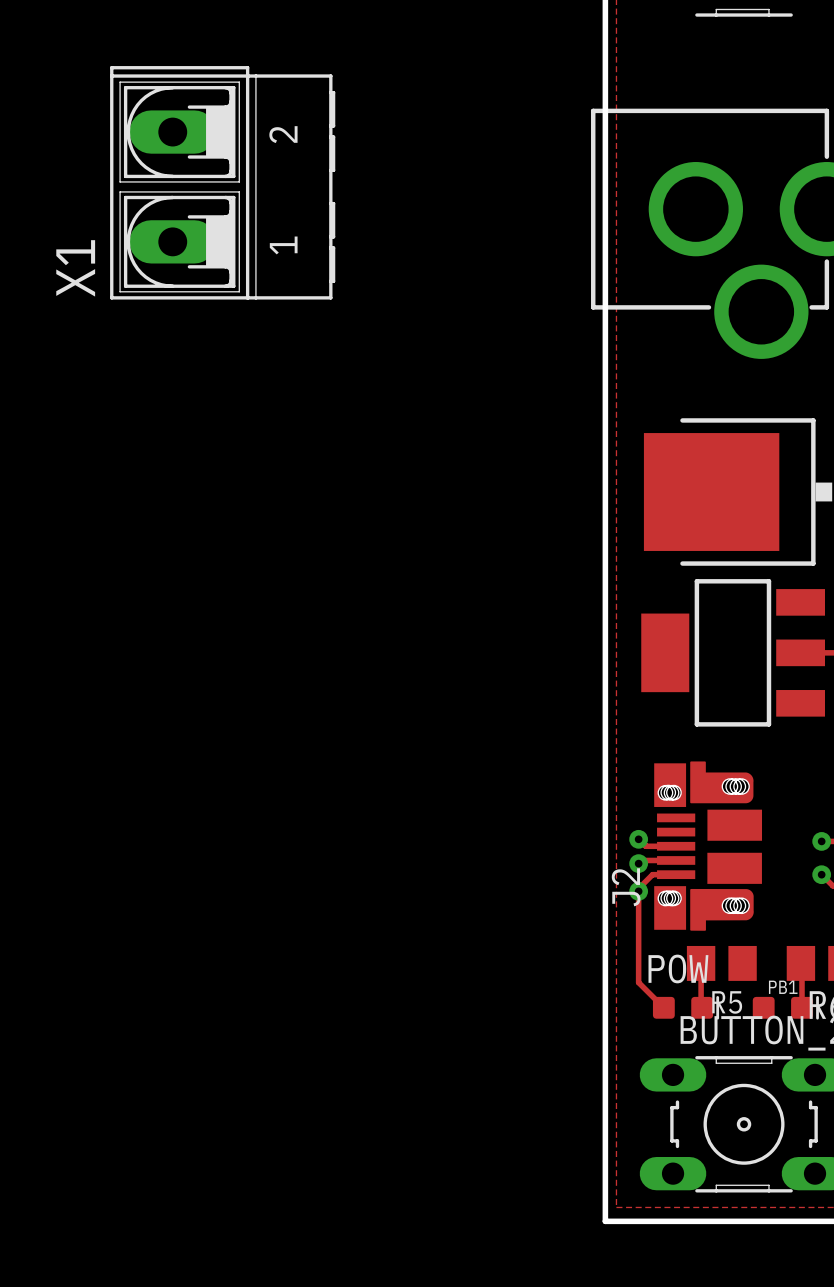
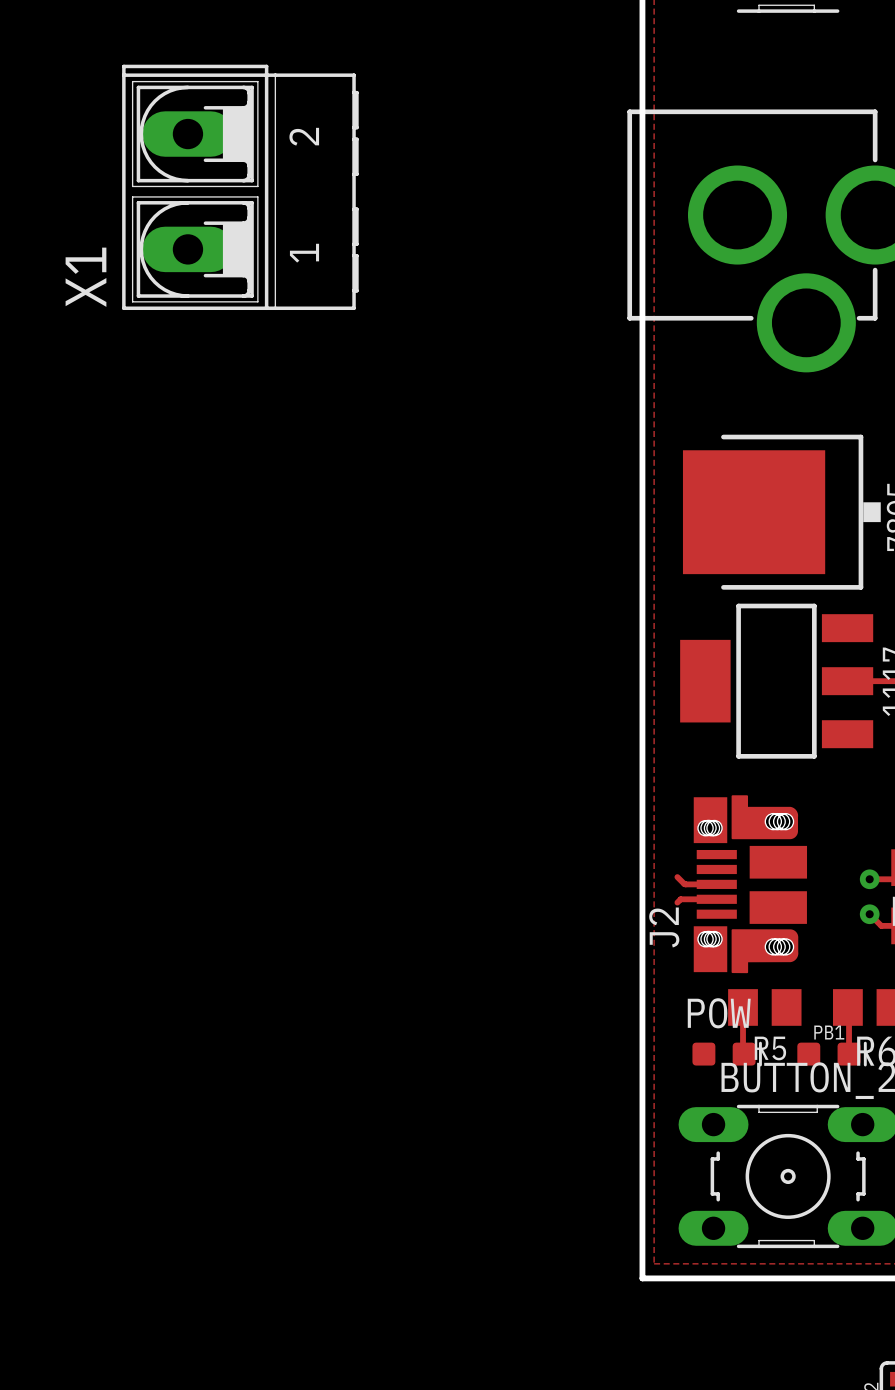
via: (638, 839) -> none
via: (638, 863) -> none
track: (676, 874) (652, 874) (638, 888) (638, 982) (663, 1007) -> none
via: (638, 891) -> none

